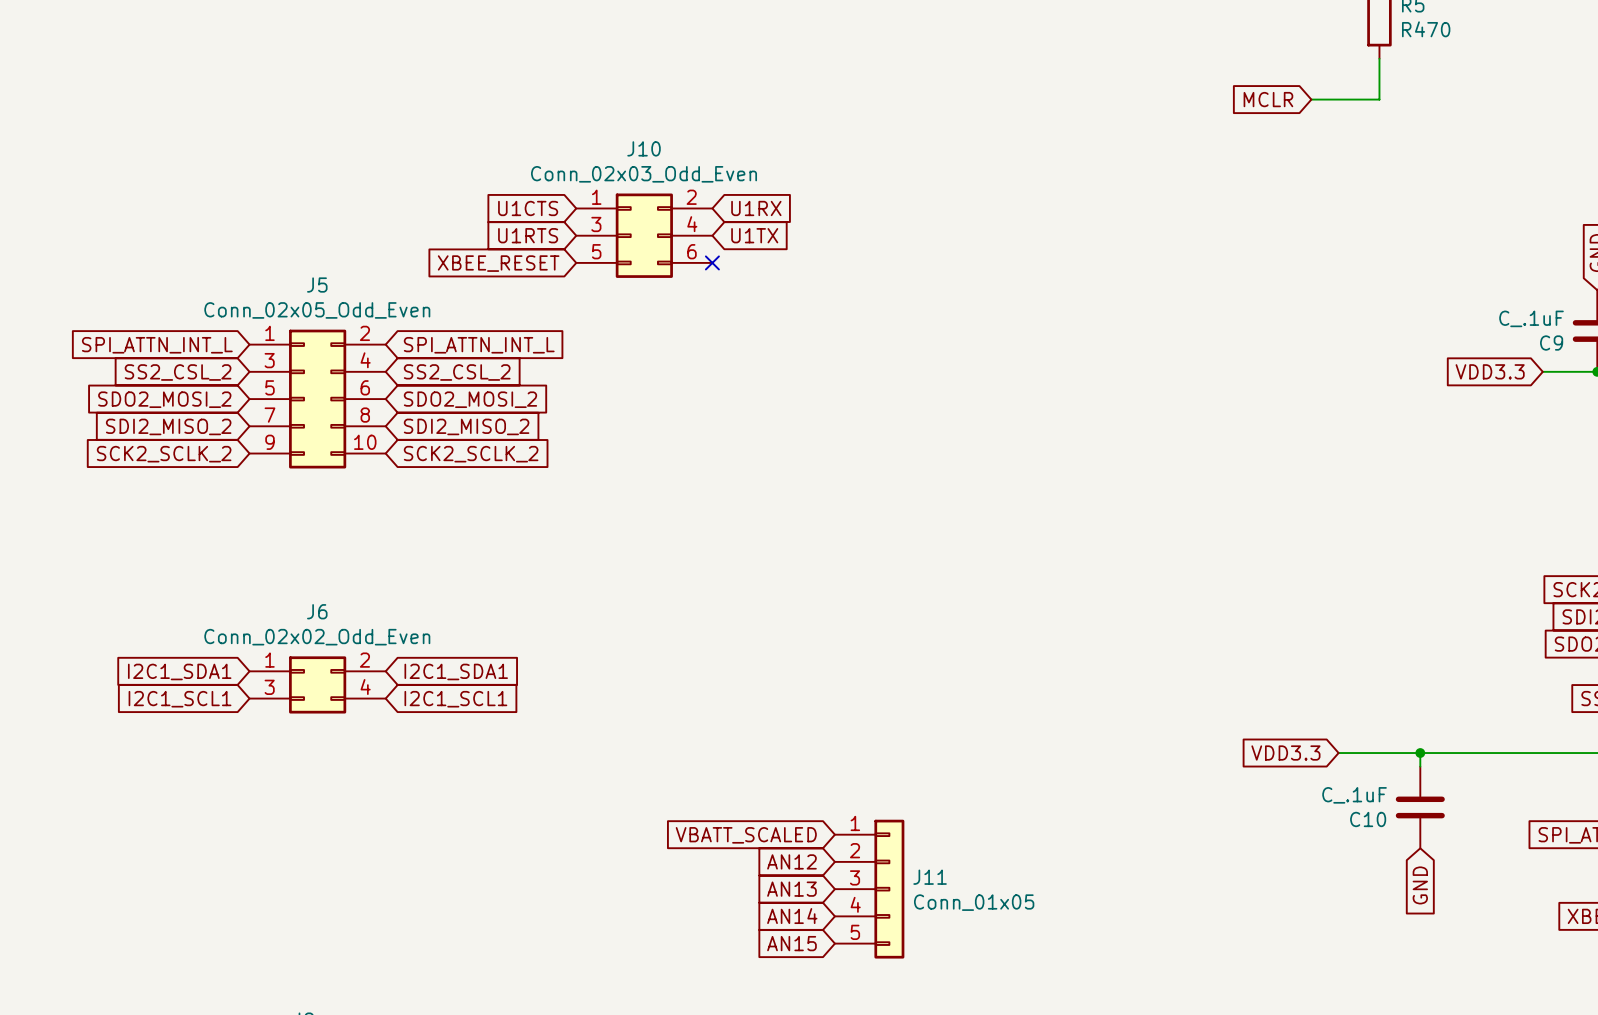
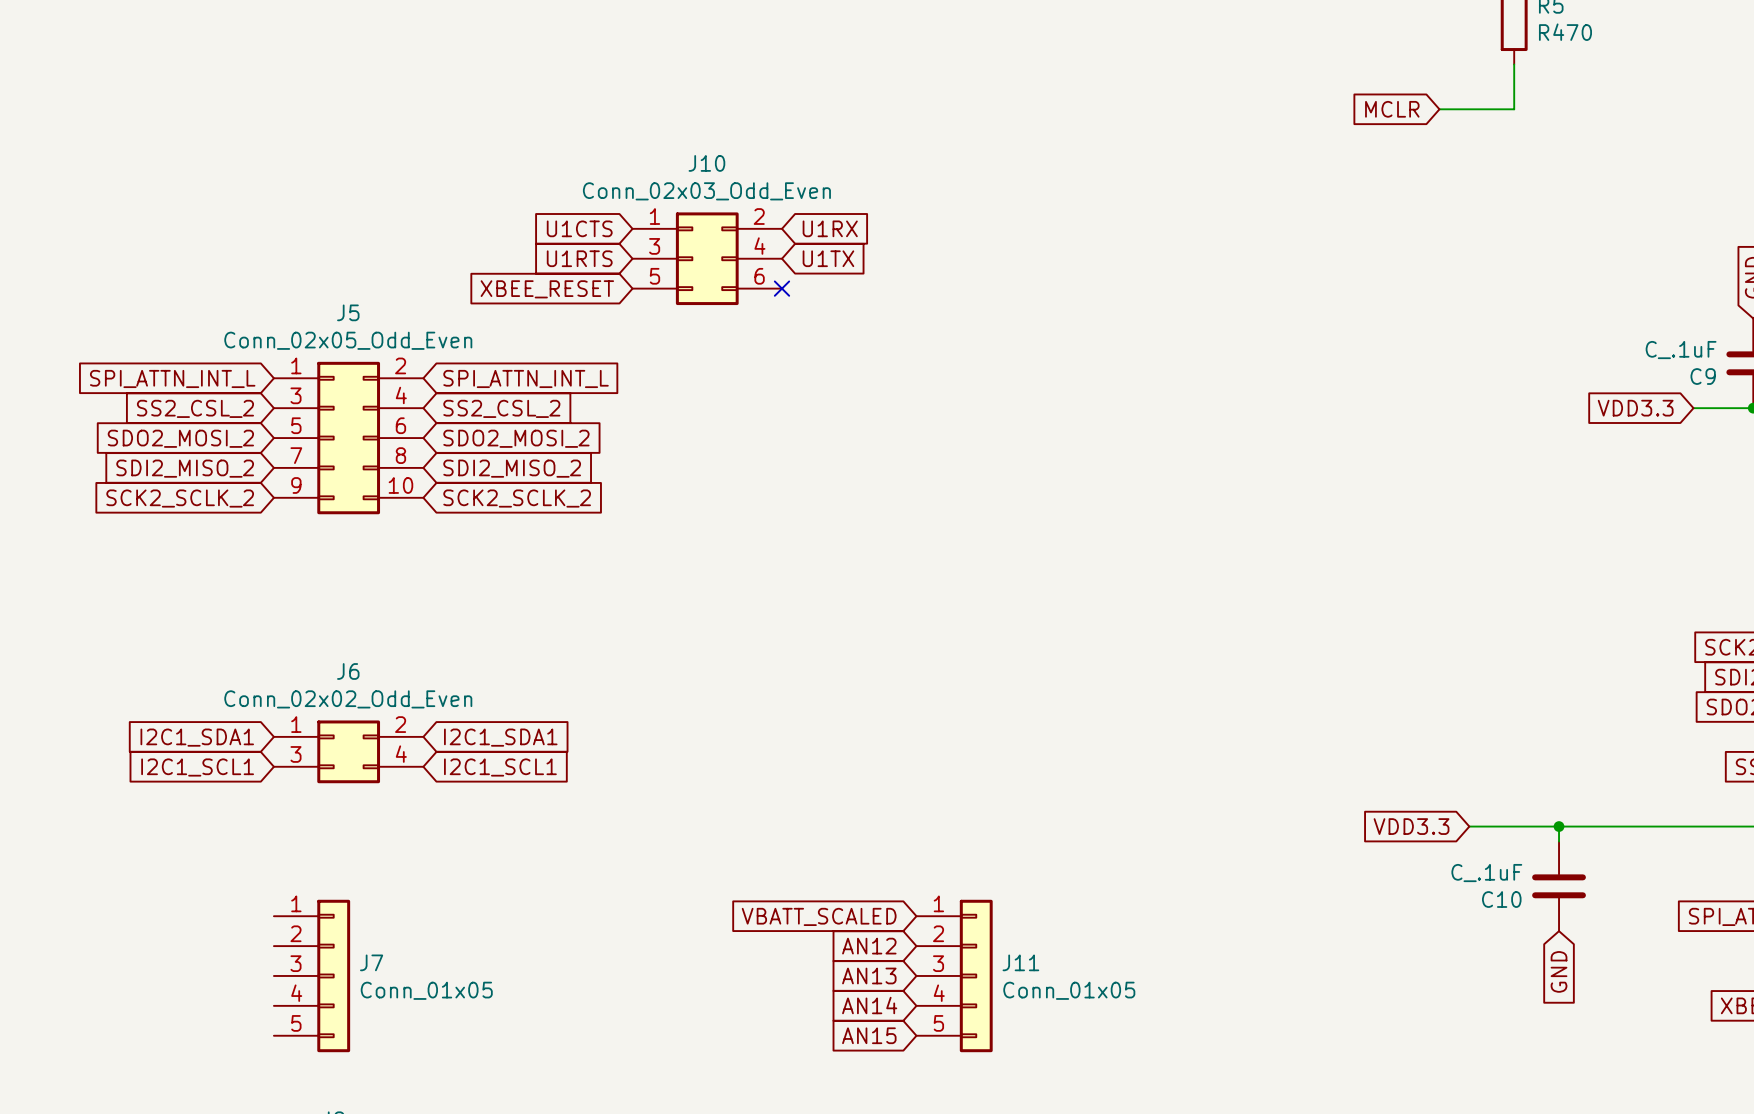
J7: none -> Conn_01x05 (312, 975)

